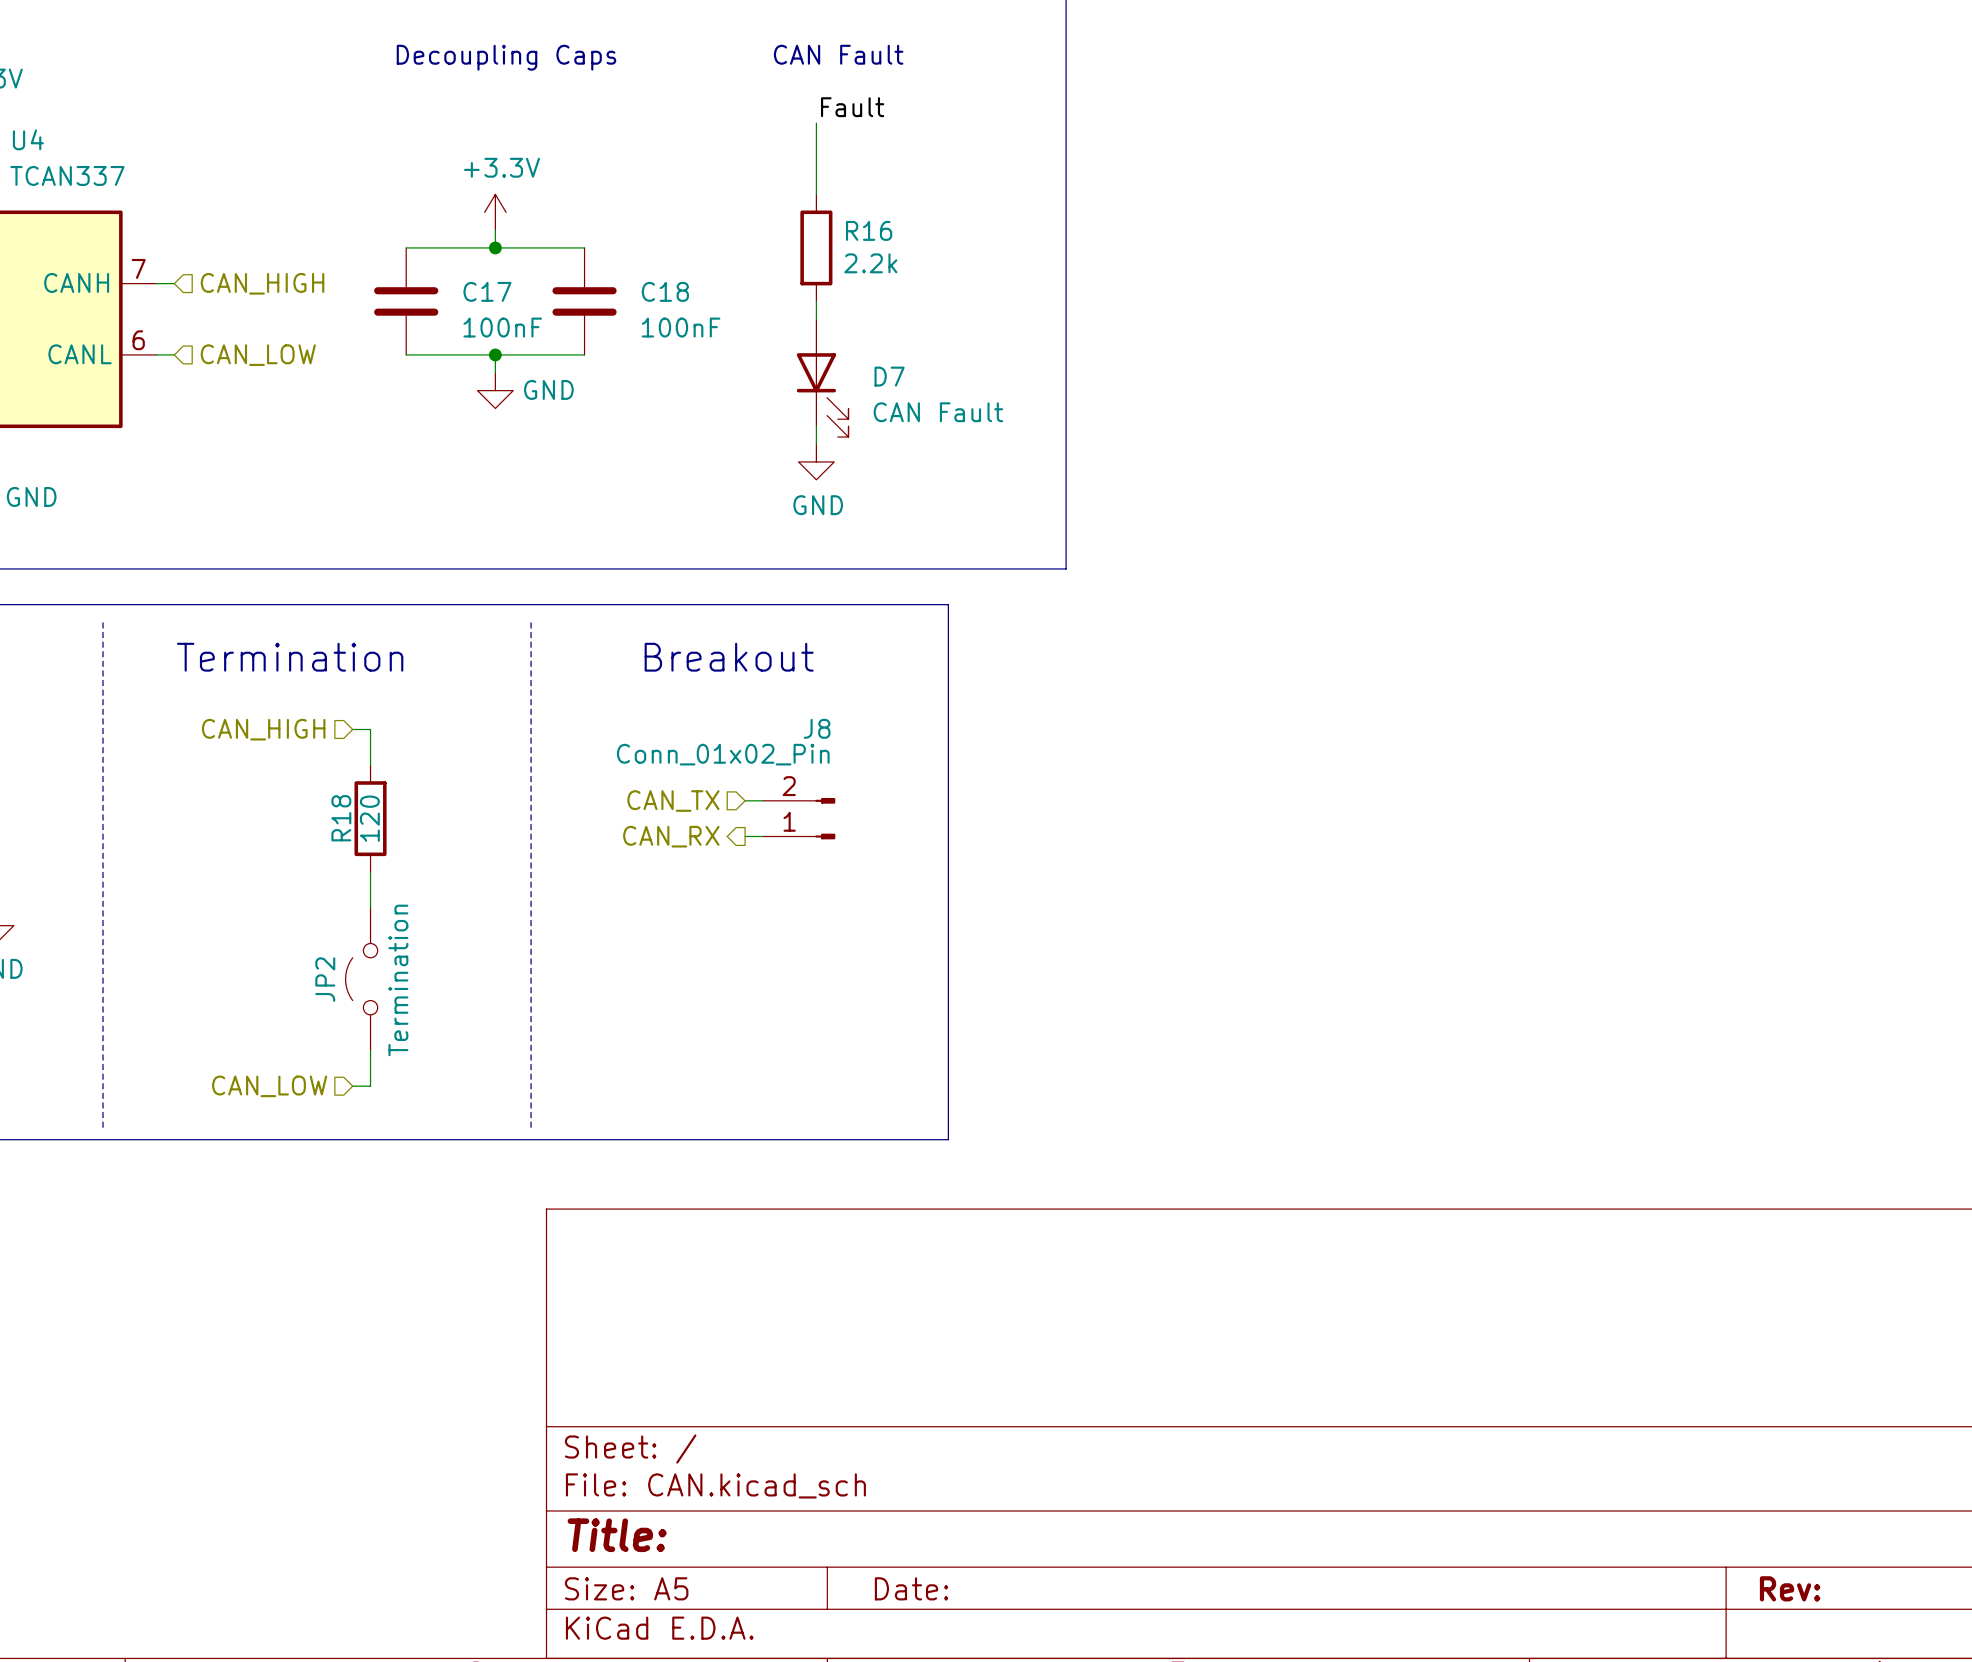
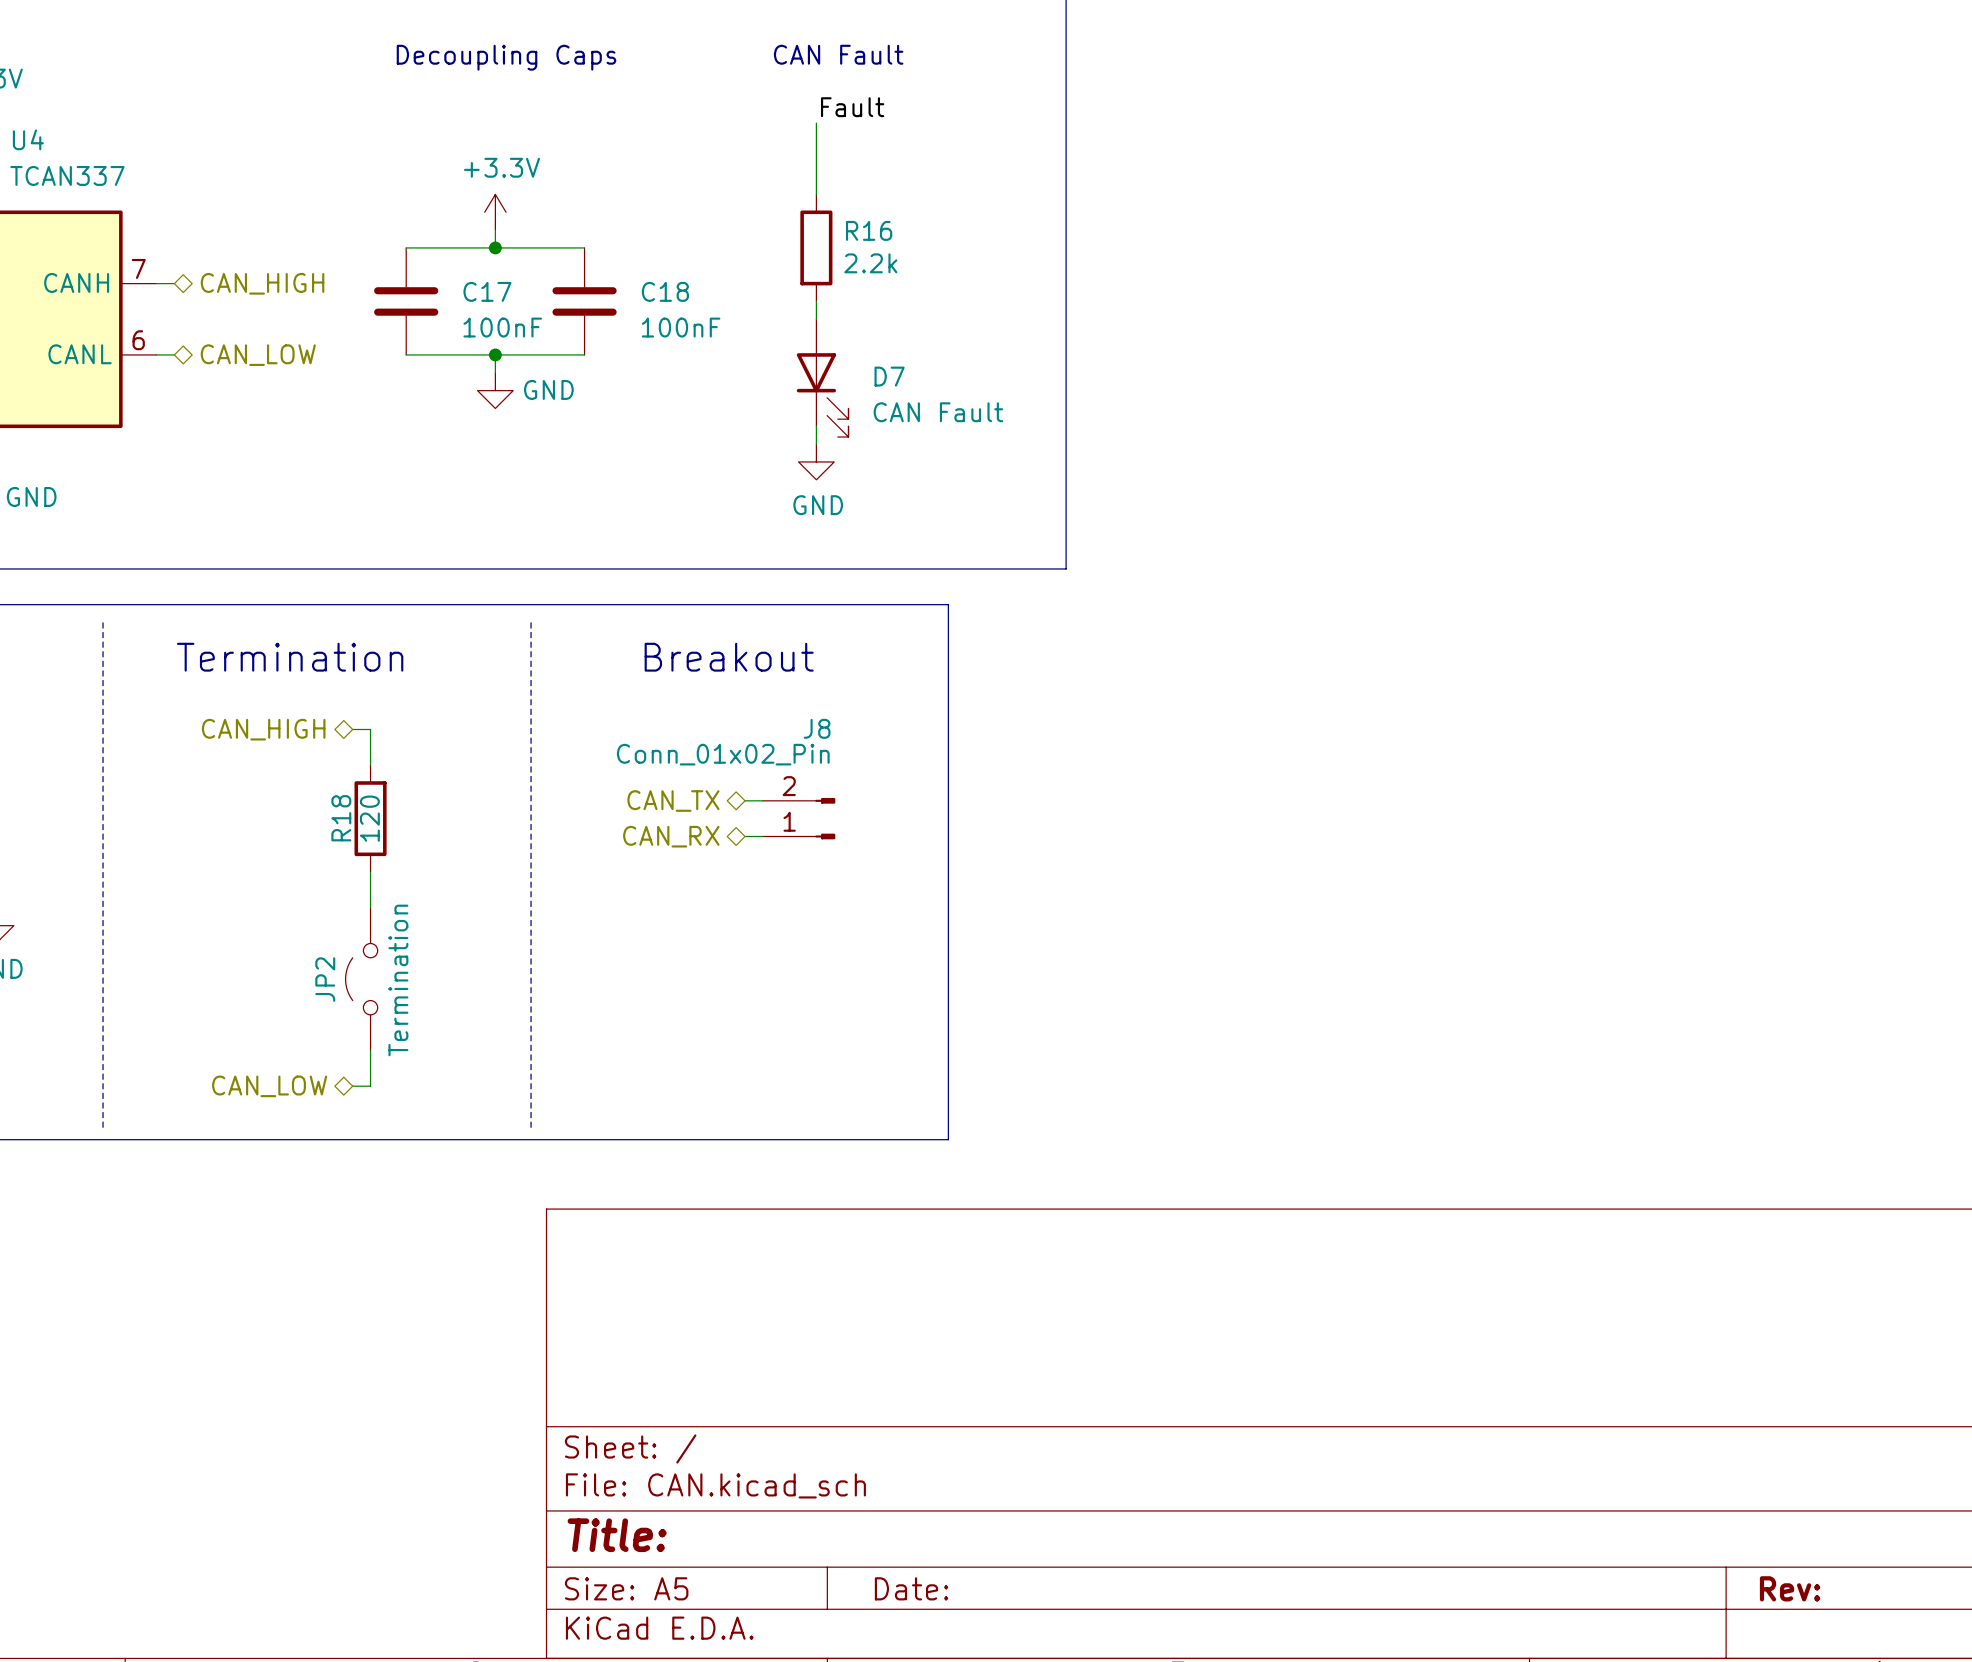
hierarchical label shape: input (262, 283) -> bidirectional (262, 283)
hierarchical label shape: input (258, 355) -> bidirectional (258, 355)
hierarchical label shape: input (263, 729) -> bidirectional (263, 729)
hierarchical label shape: input (673, 801) -> bidirectional (673, 801)
hierarchical label shape: output (671, 836) -> bidirectional (671, 836)
hierarchical label shape: input (269, 1086) -> bidirectional (269, 1086)

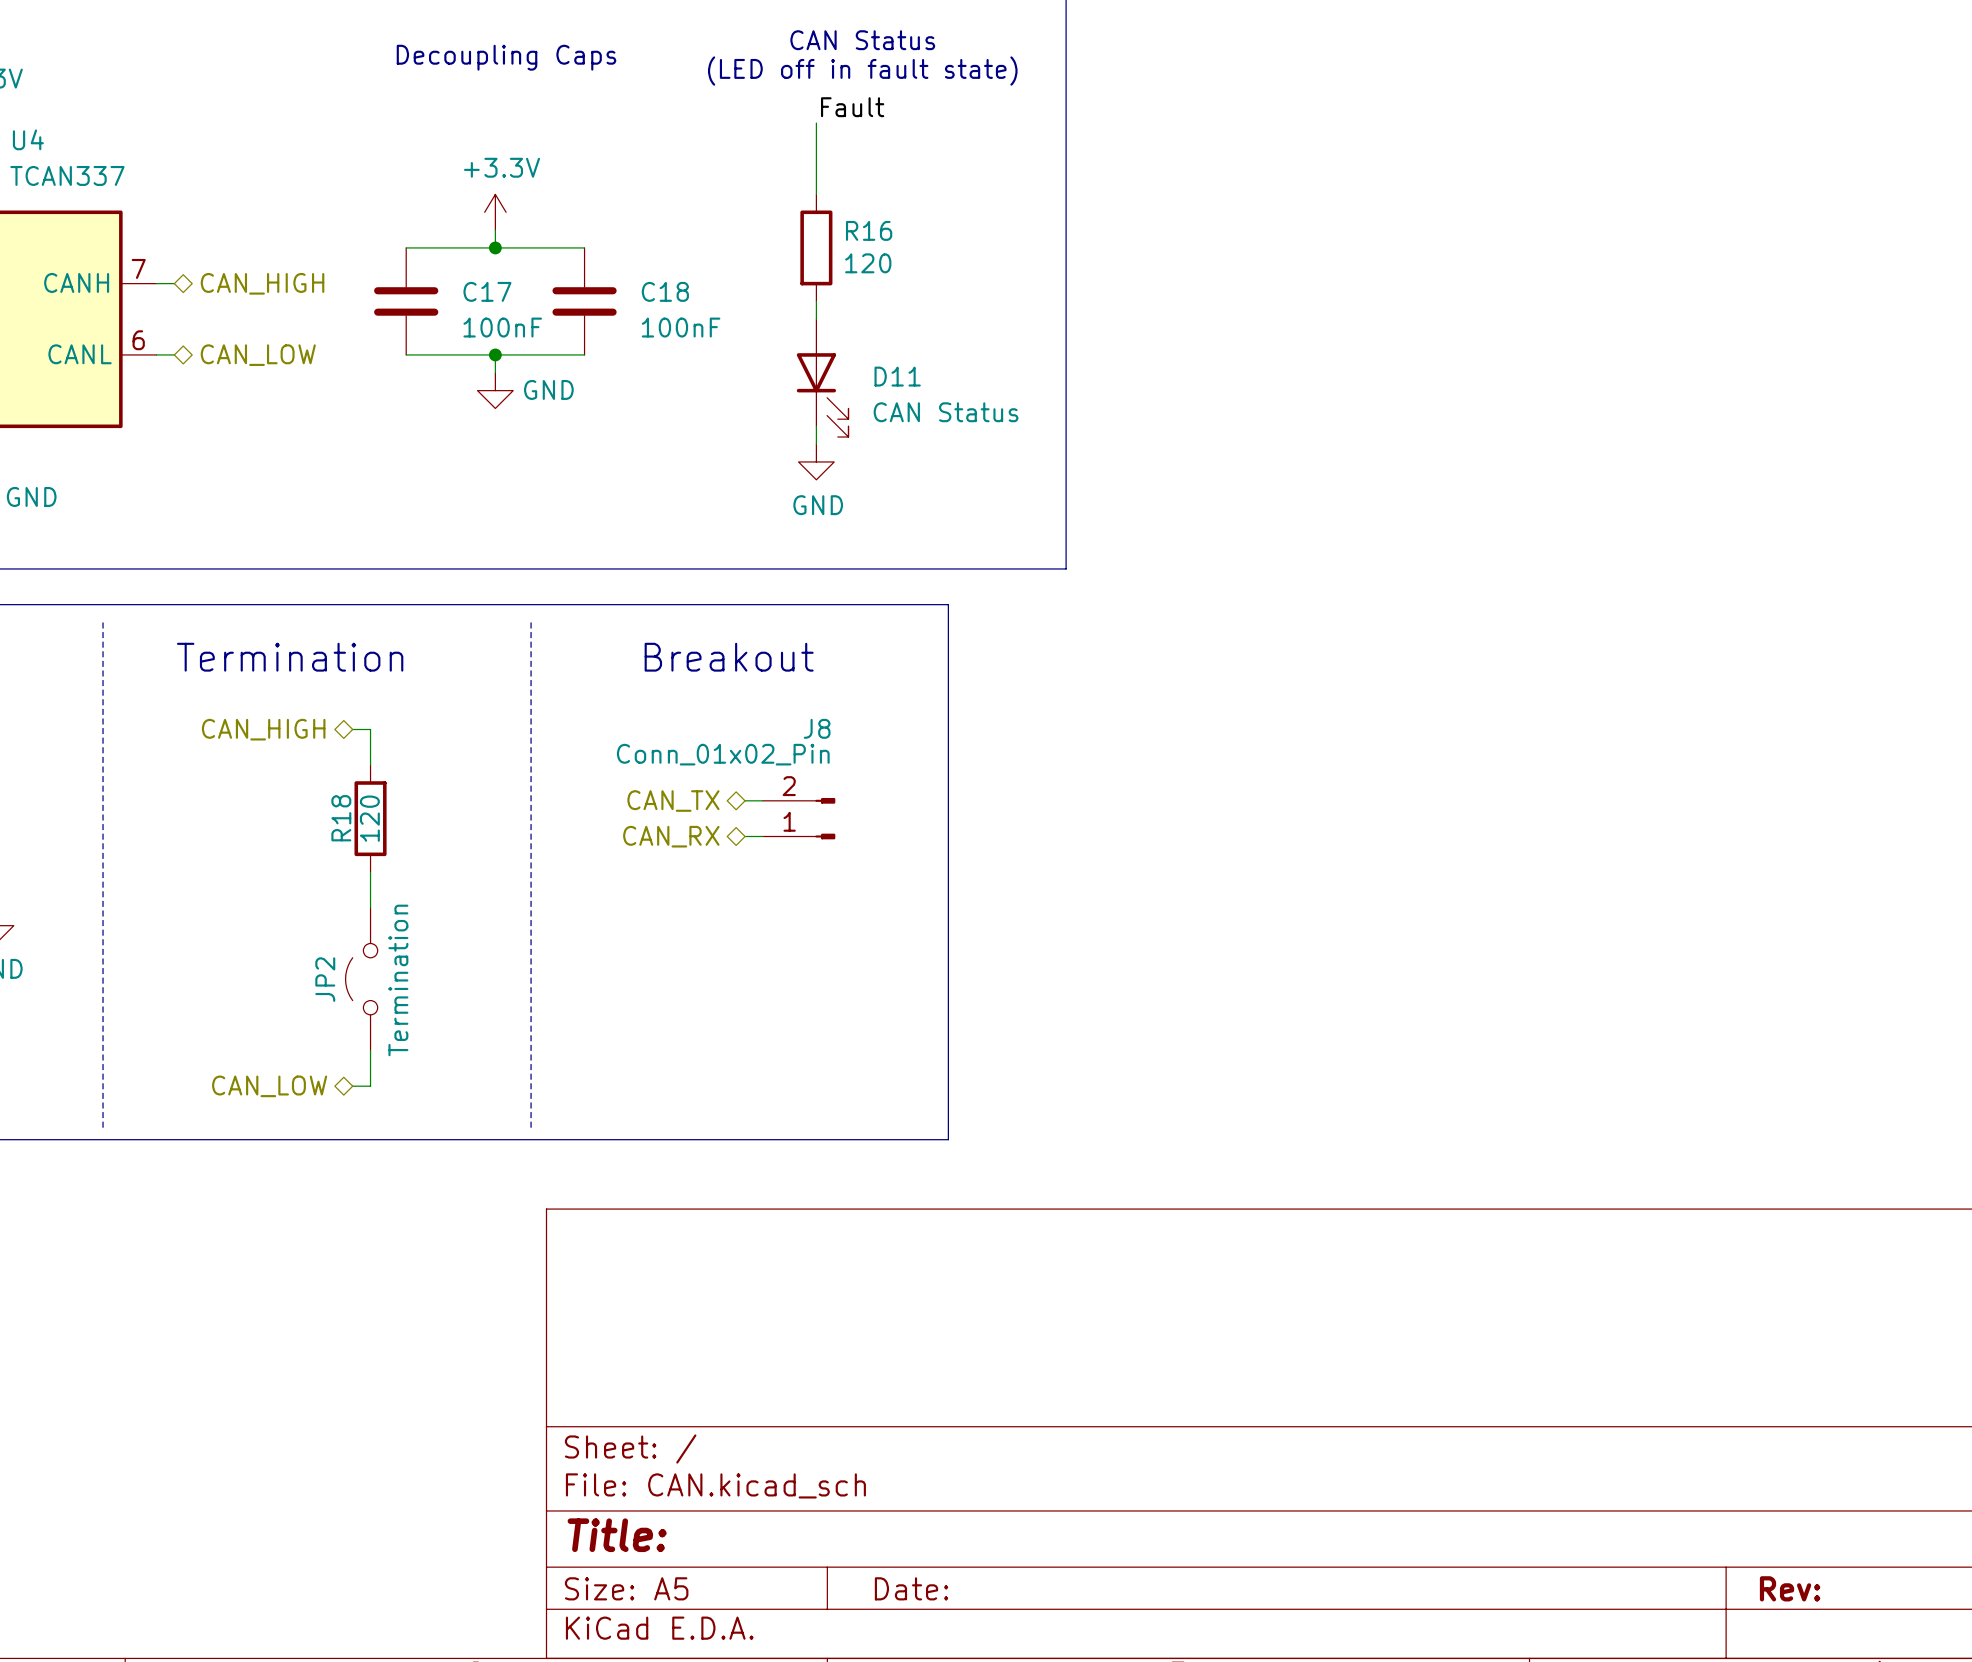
text: CAN Fault (838, 54) -> CAN Status (862, 40)
text: none -> (LED off in fault state) (862, 71)
R16 value: 2.2k (870, 263) -> 120 (868, 263)
D7 name: D7 (889, 376) -> D11 (897, 376)
D7 value: CAN Fault (938, 412) -> CAN Status (946, 412)

